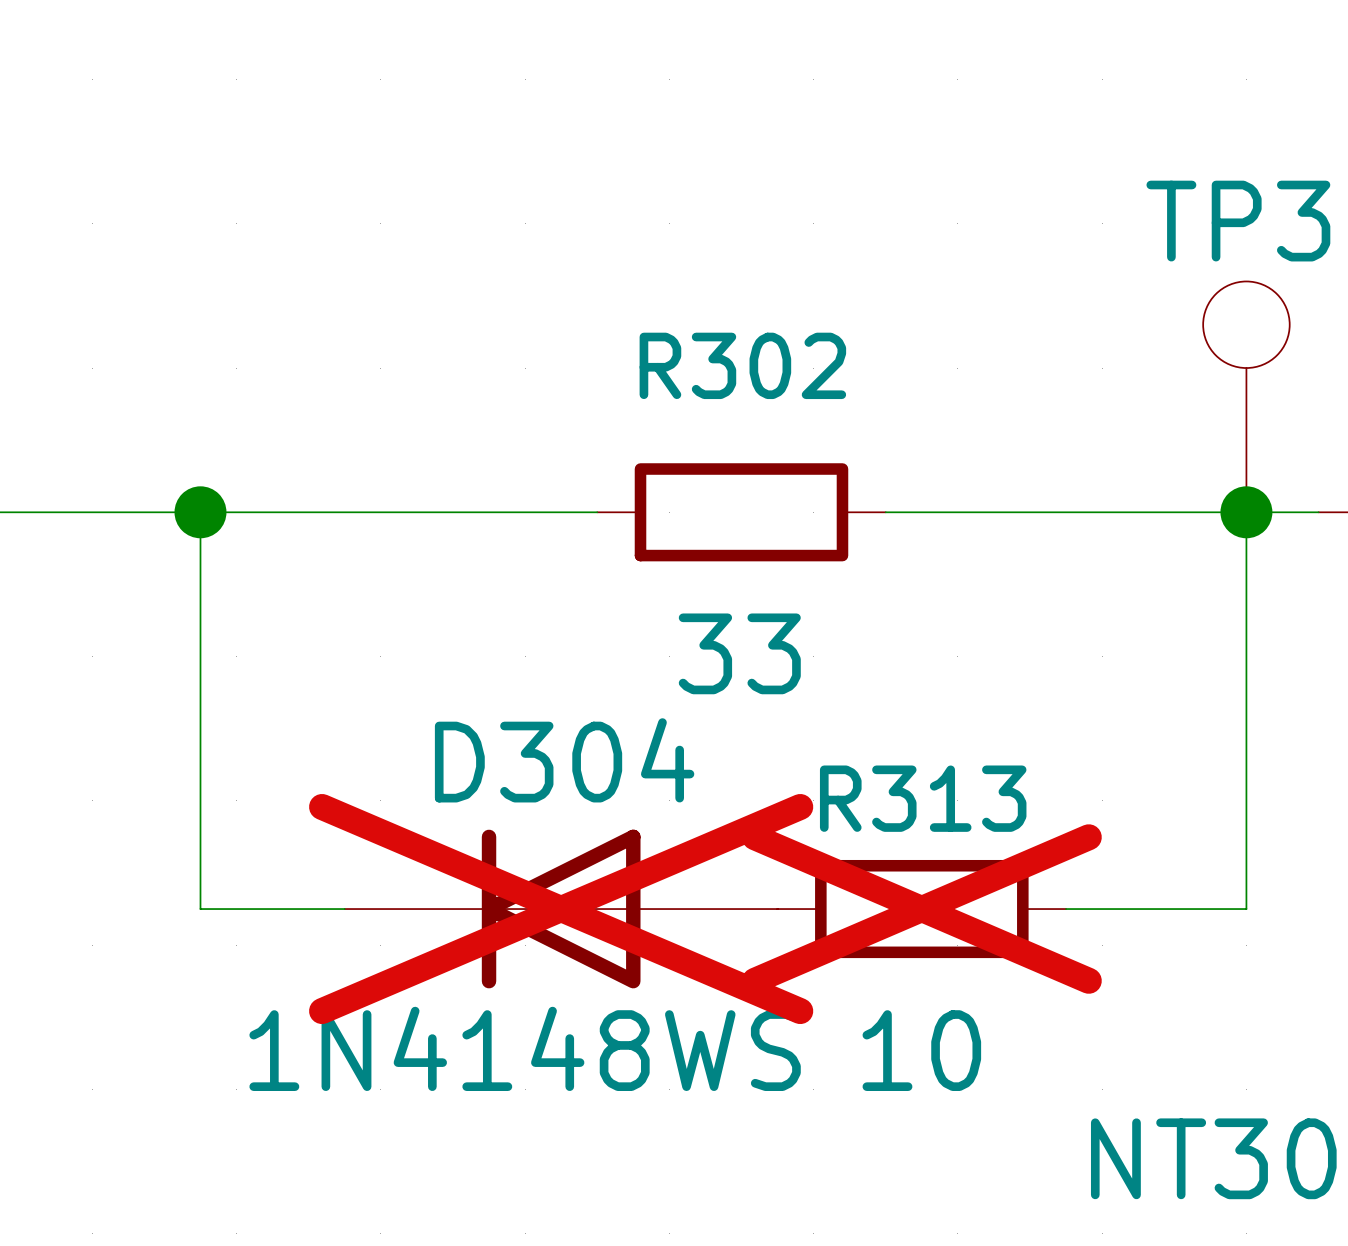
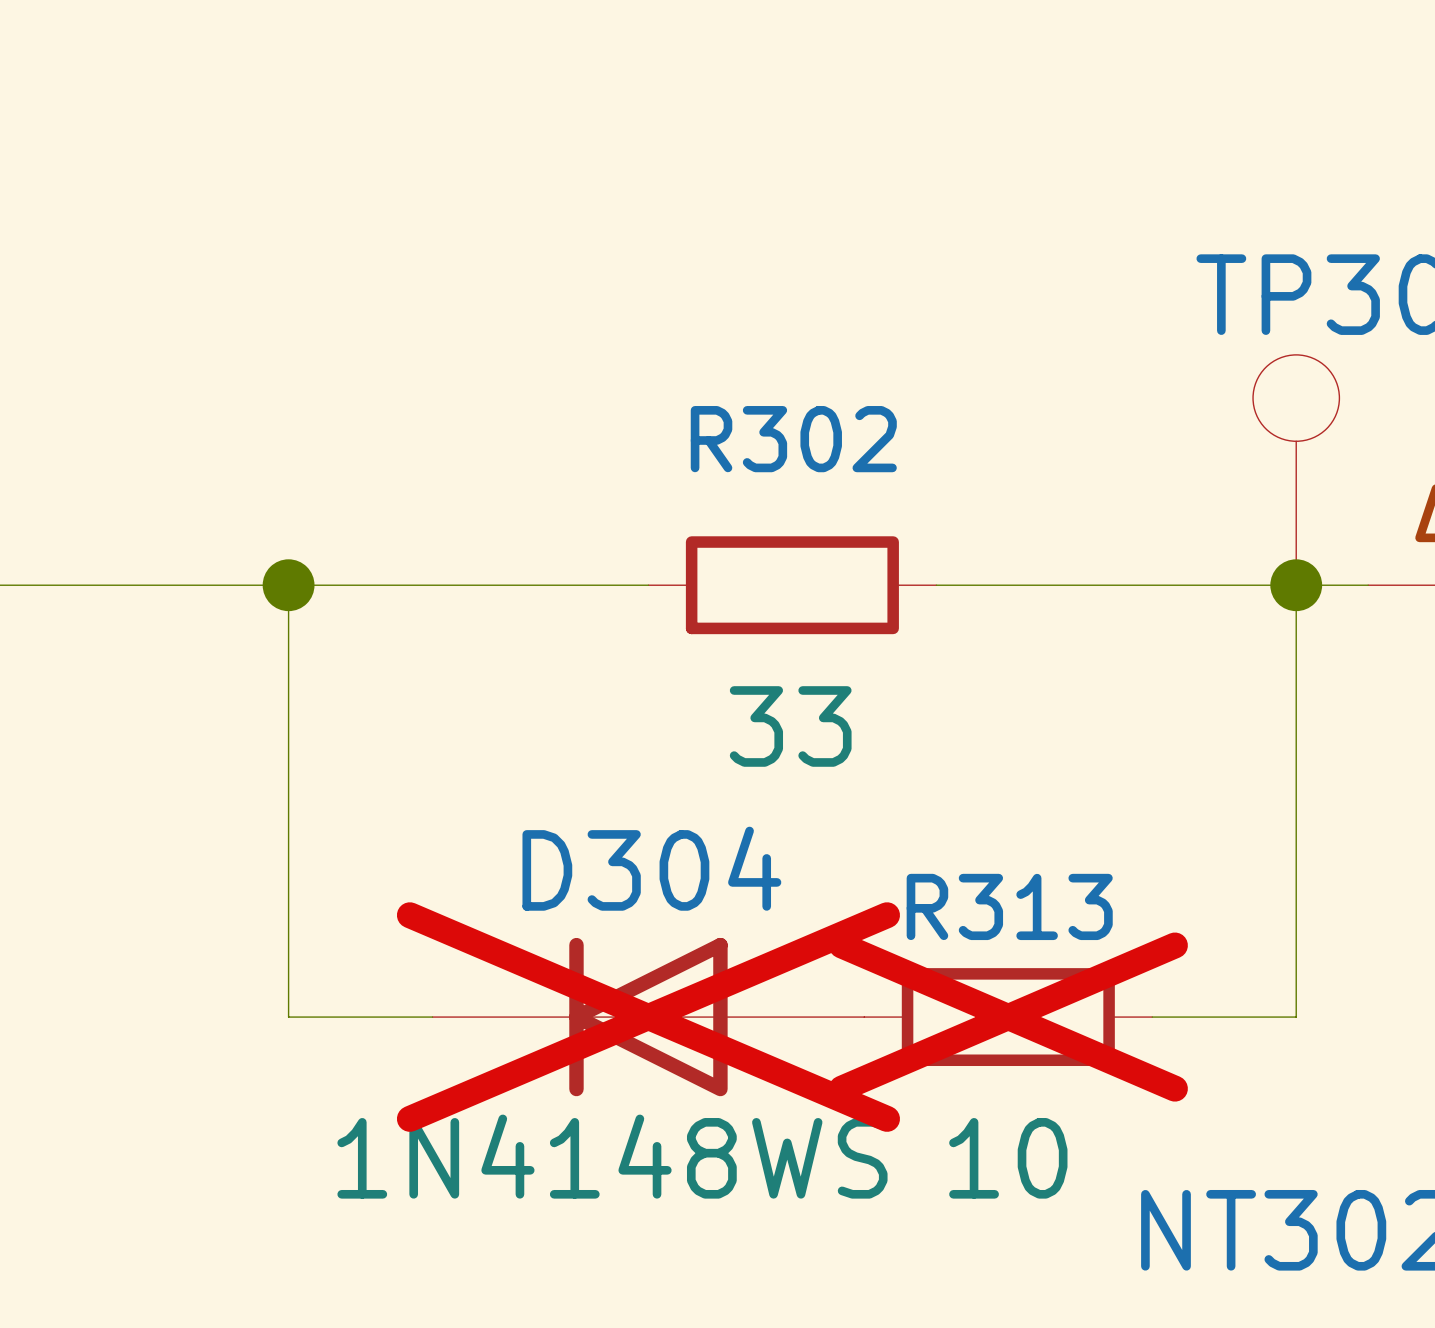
wire: (200, 512) (200, 909) (344, 909) -> none
junction position: (200, 512) -> (288, 585)
wire: none -> (288, 585) (288, 1017) (432, 1017)
D304 position: (561, 909) -> (648, 1017)
R313 position: (921, 909) -> (1008, 1017)
wire: (1066, 909) (1246, 909) -> (1152, 1017) (1296, 1017) (1296, 981)

